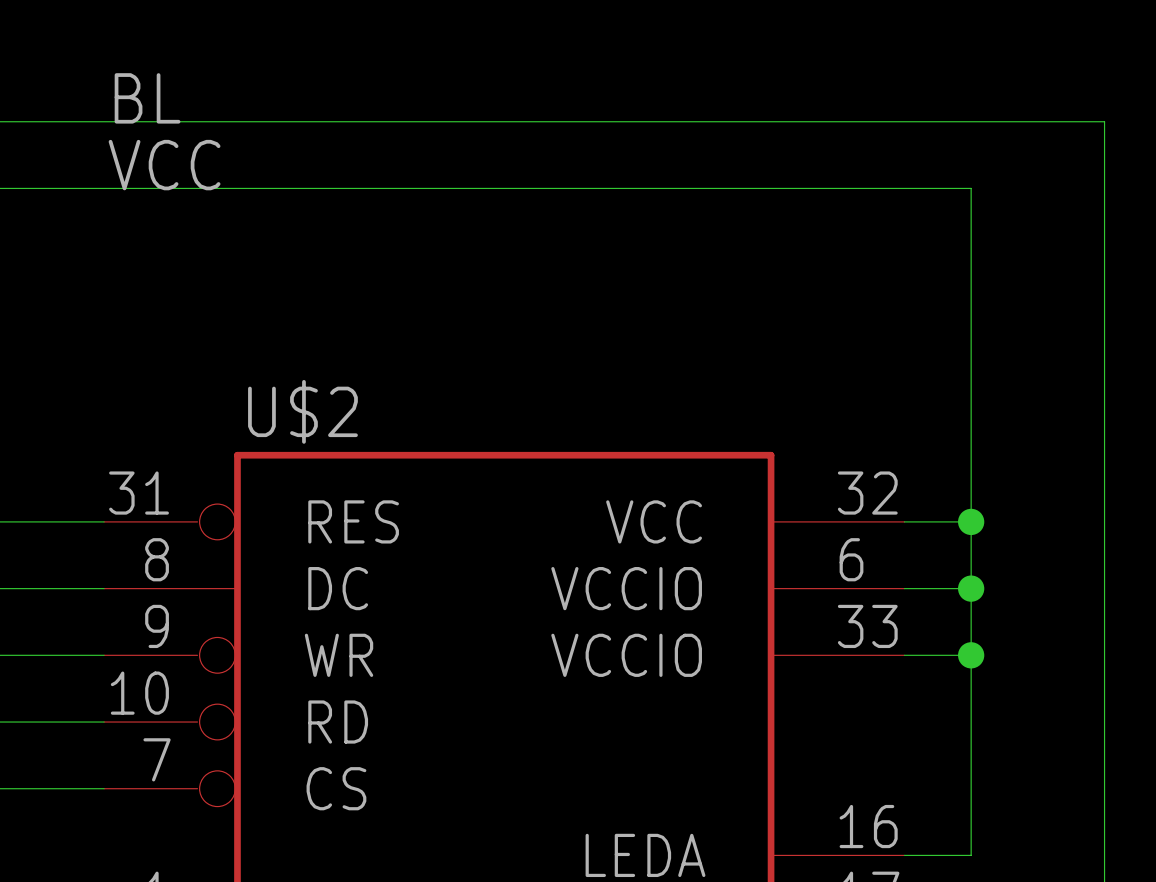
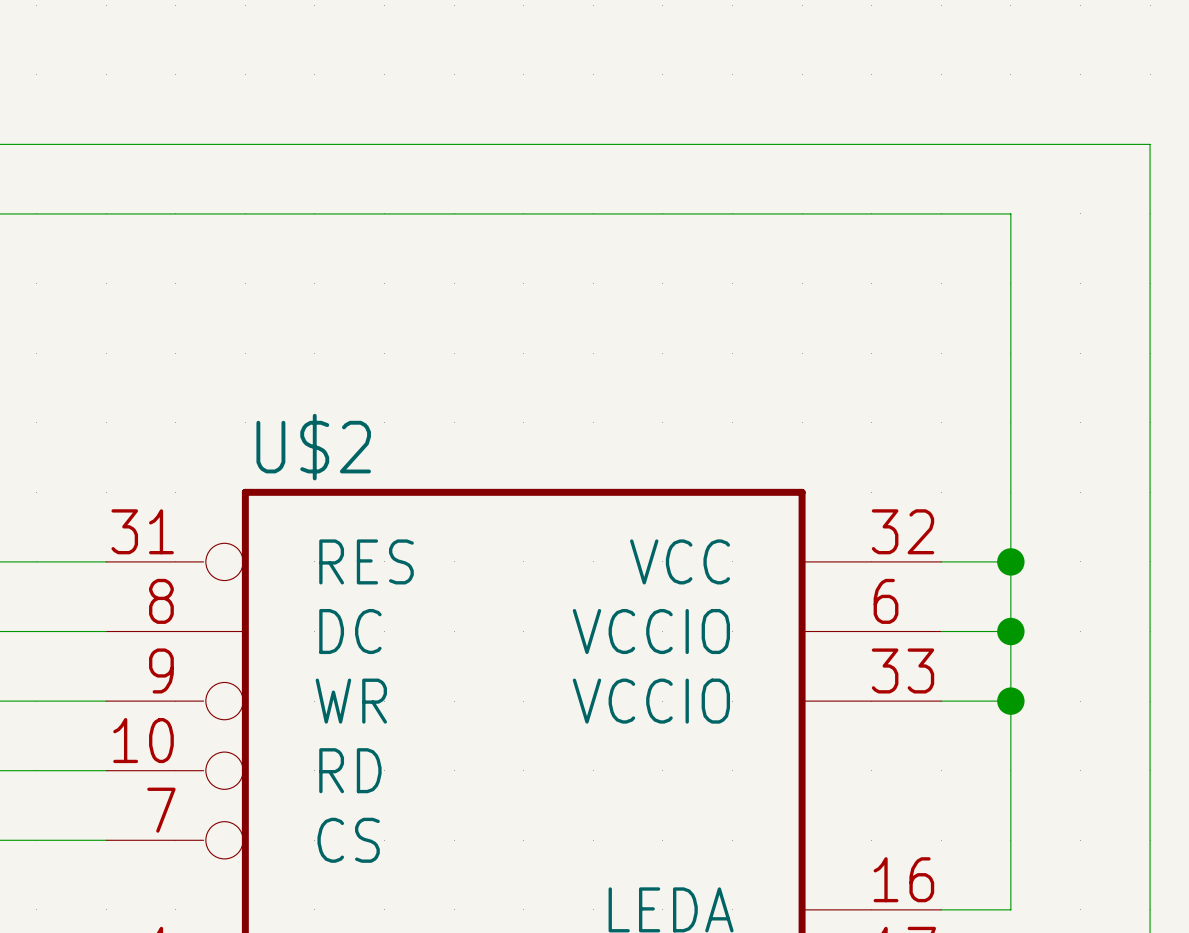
label: BL (147, 98) -> none
label: VCC (164, 165) -> none

